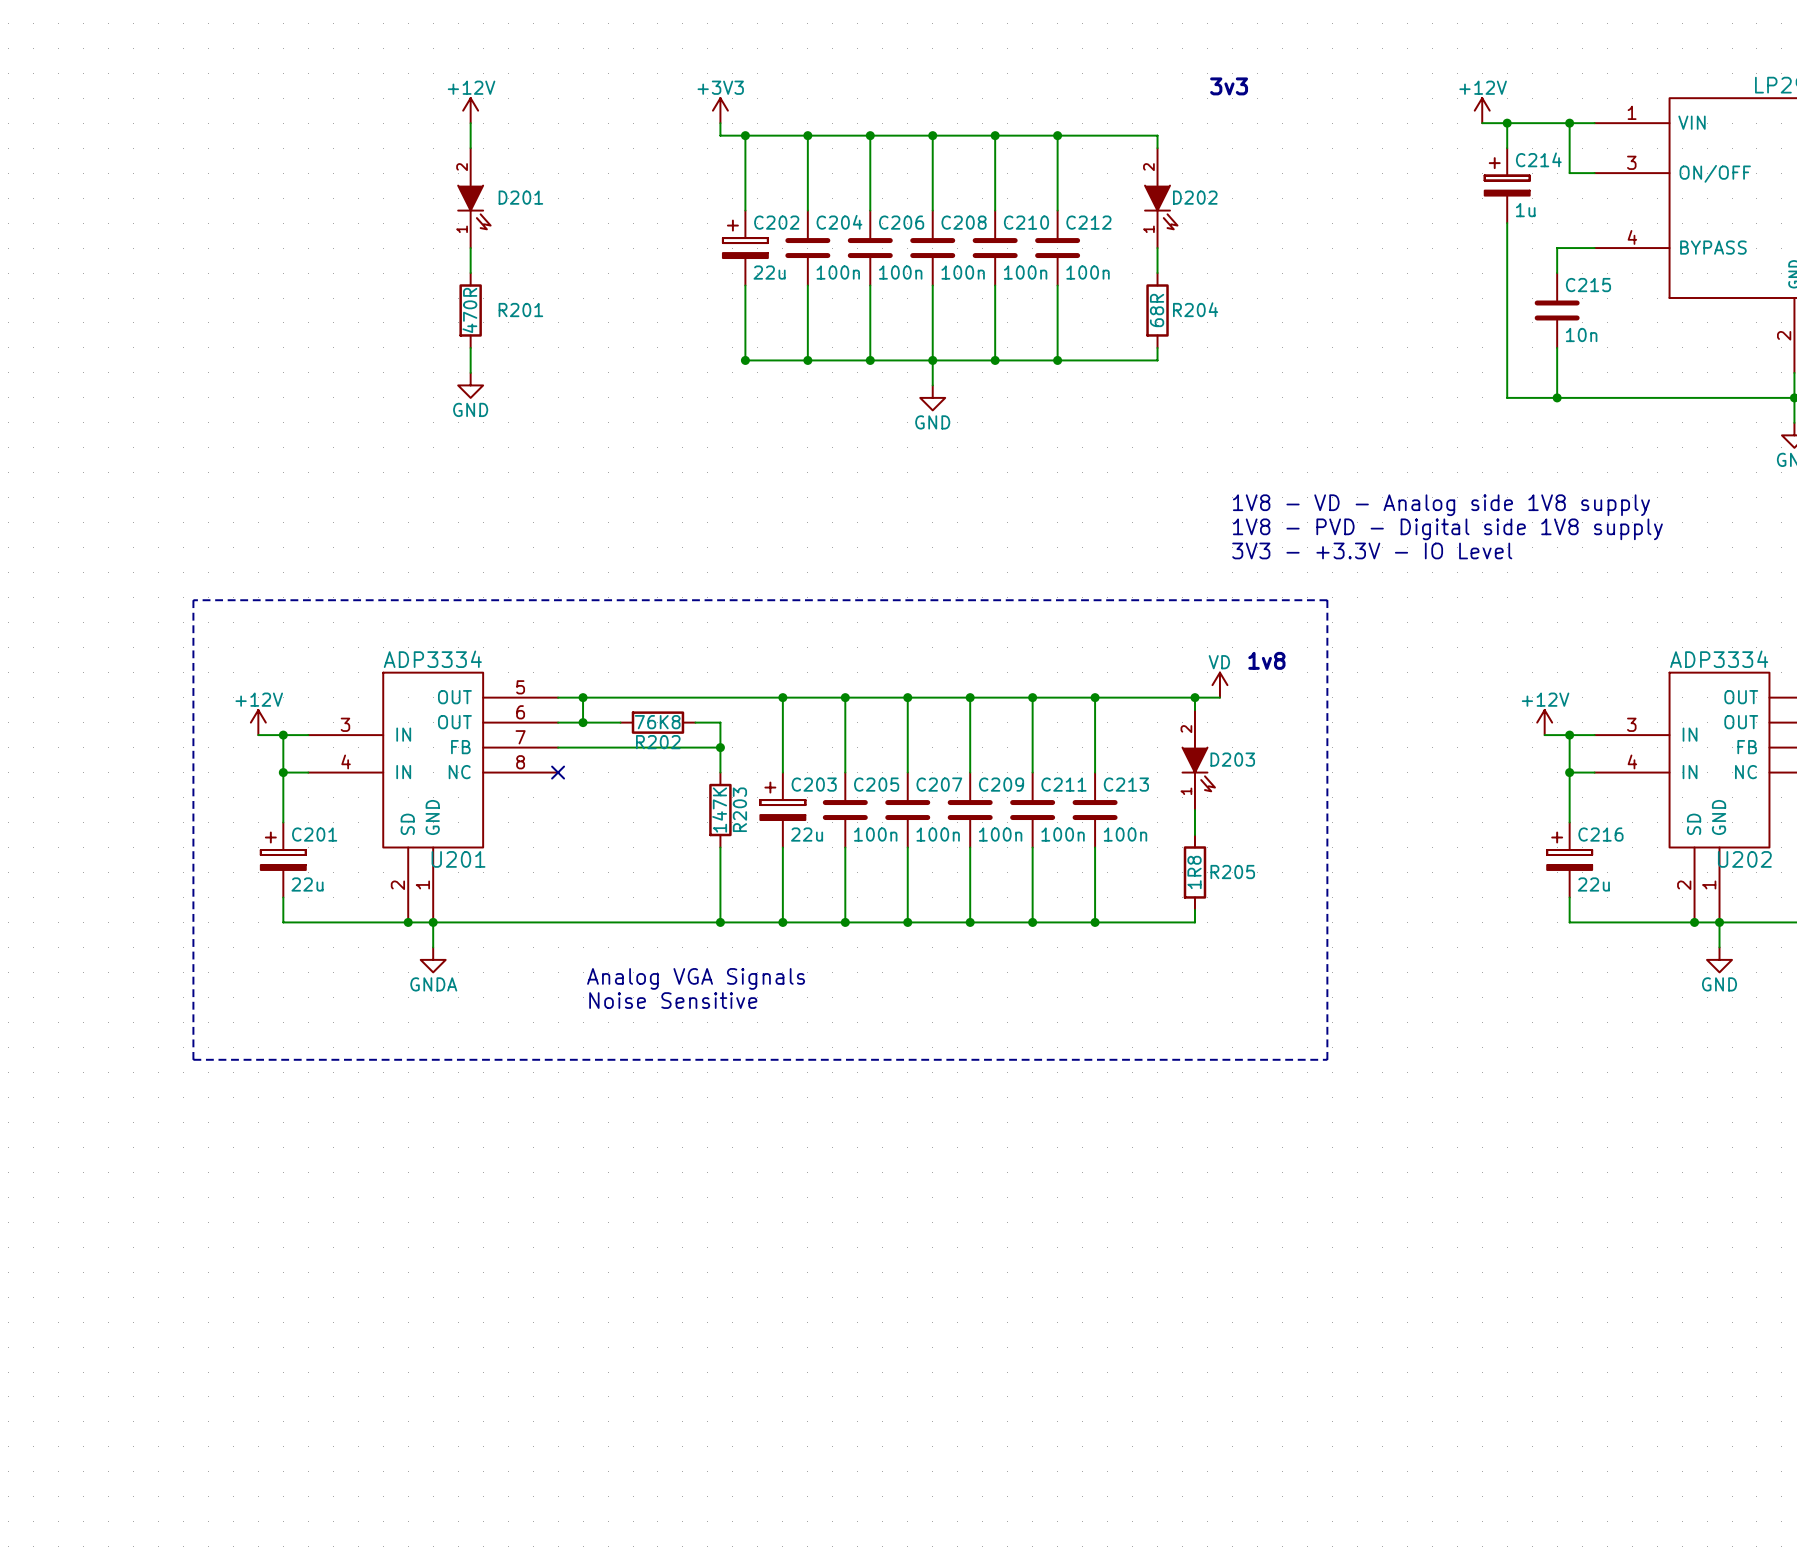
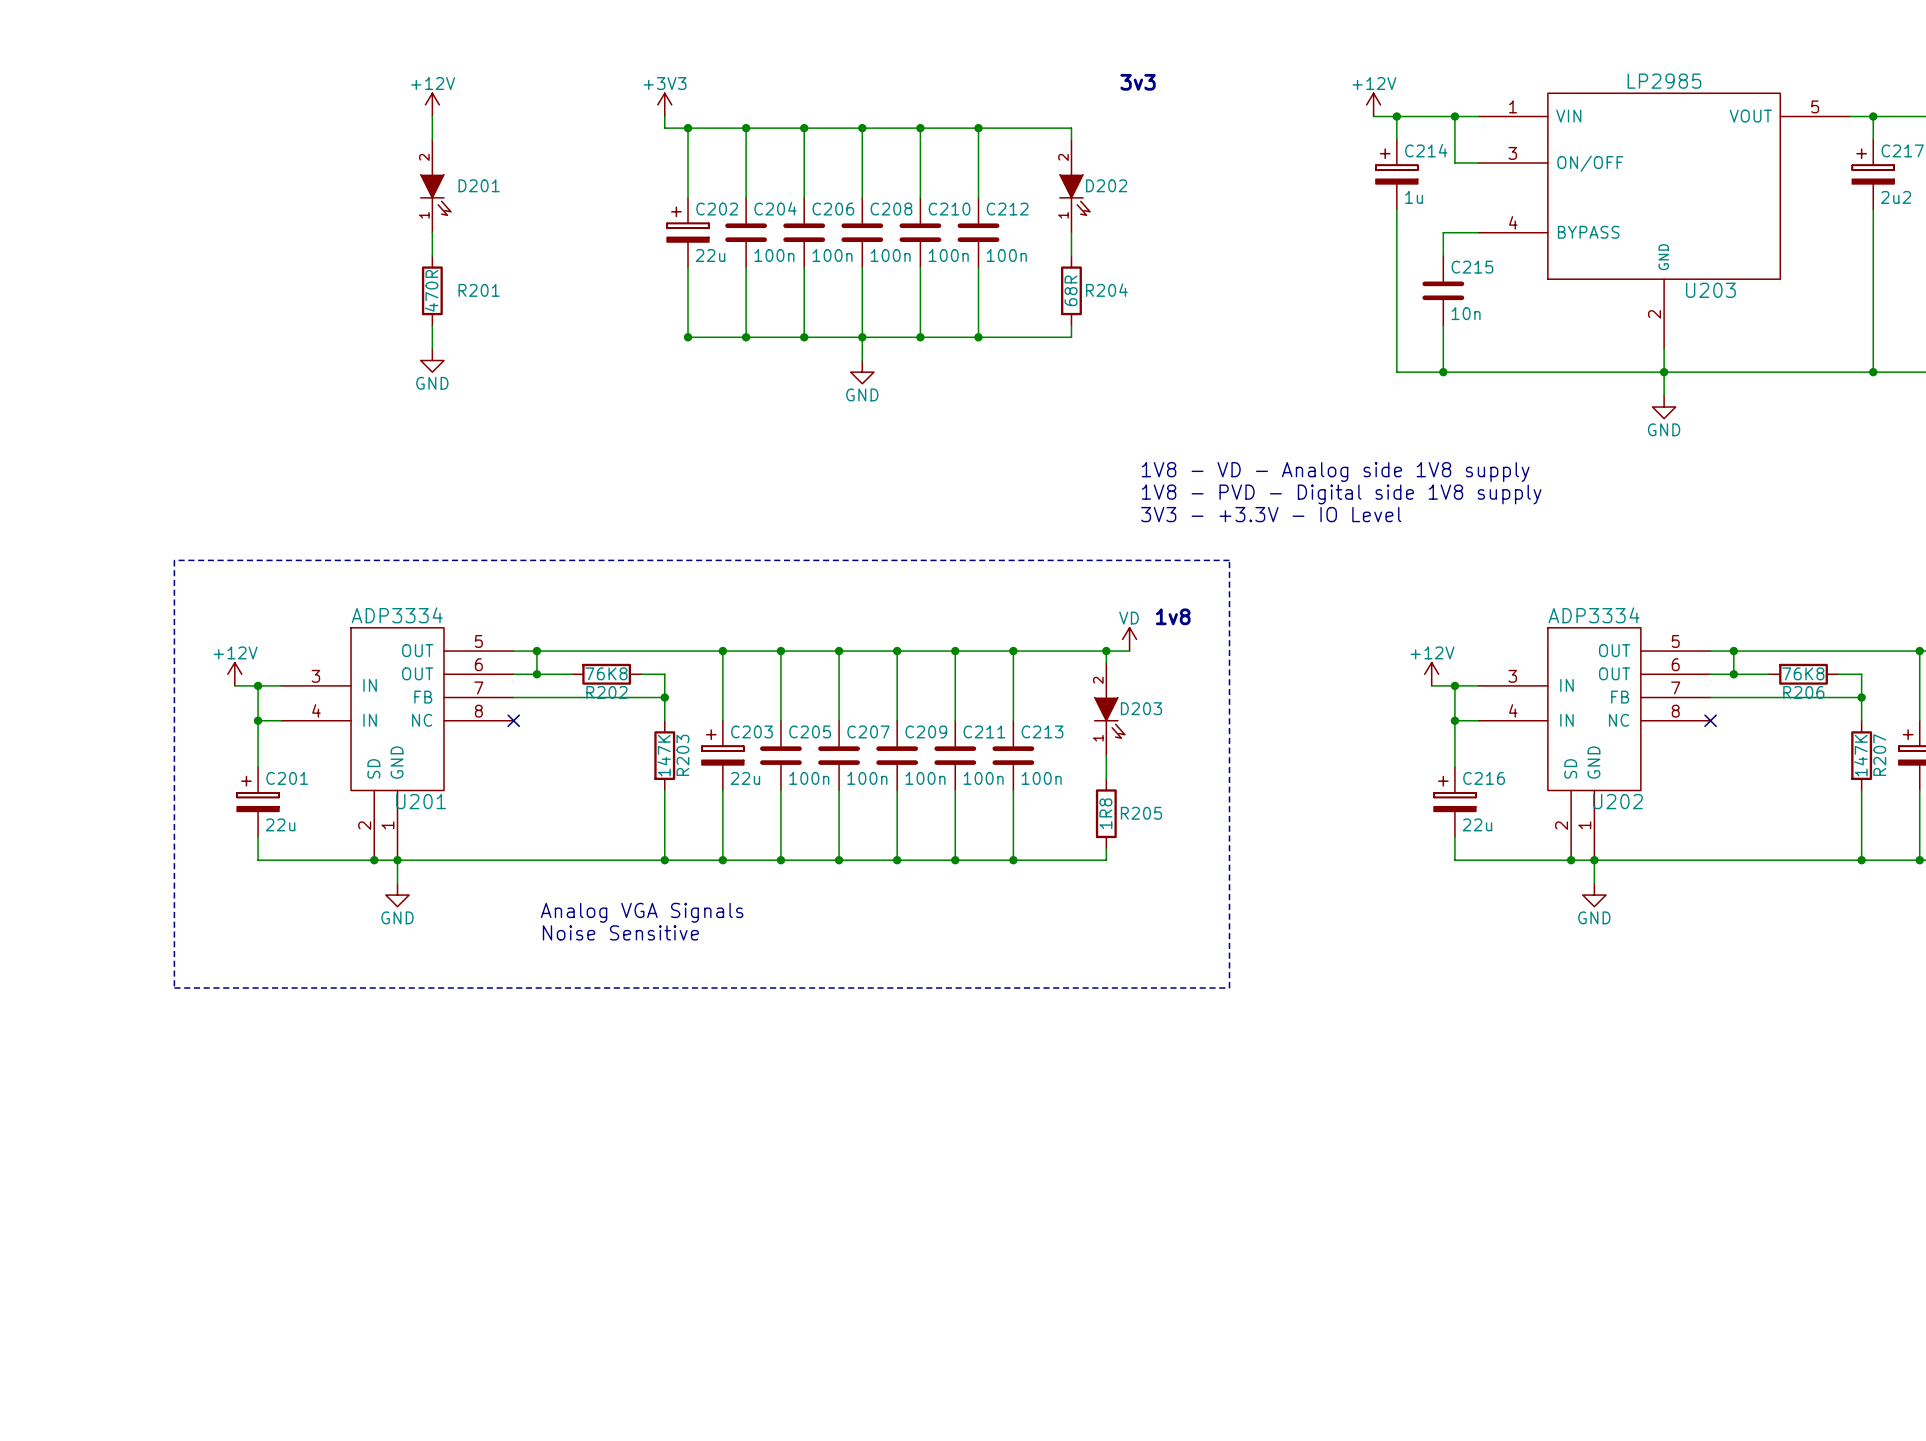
power symbol: GNDA (433, 959) -> GND (397, 895)

